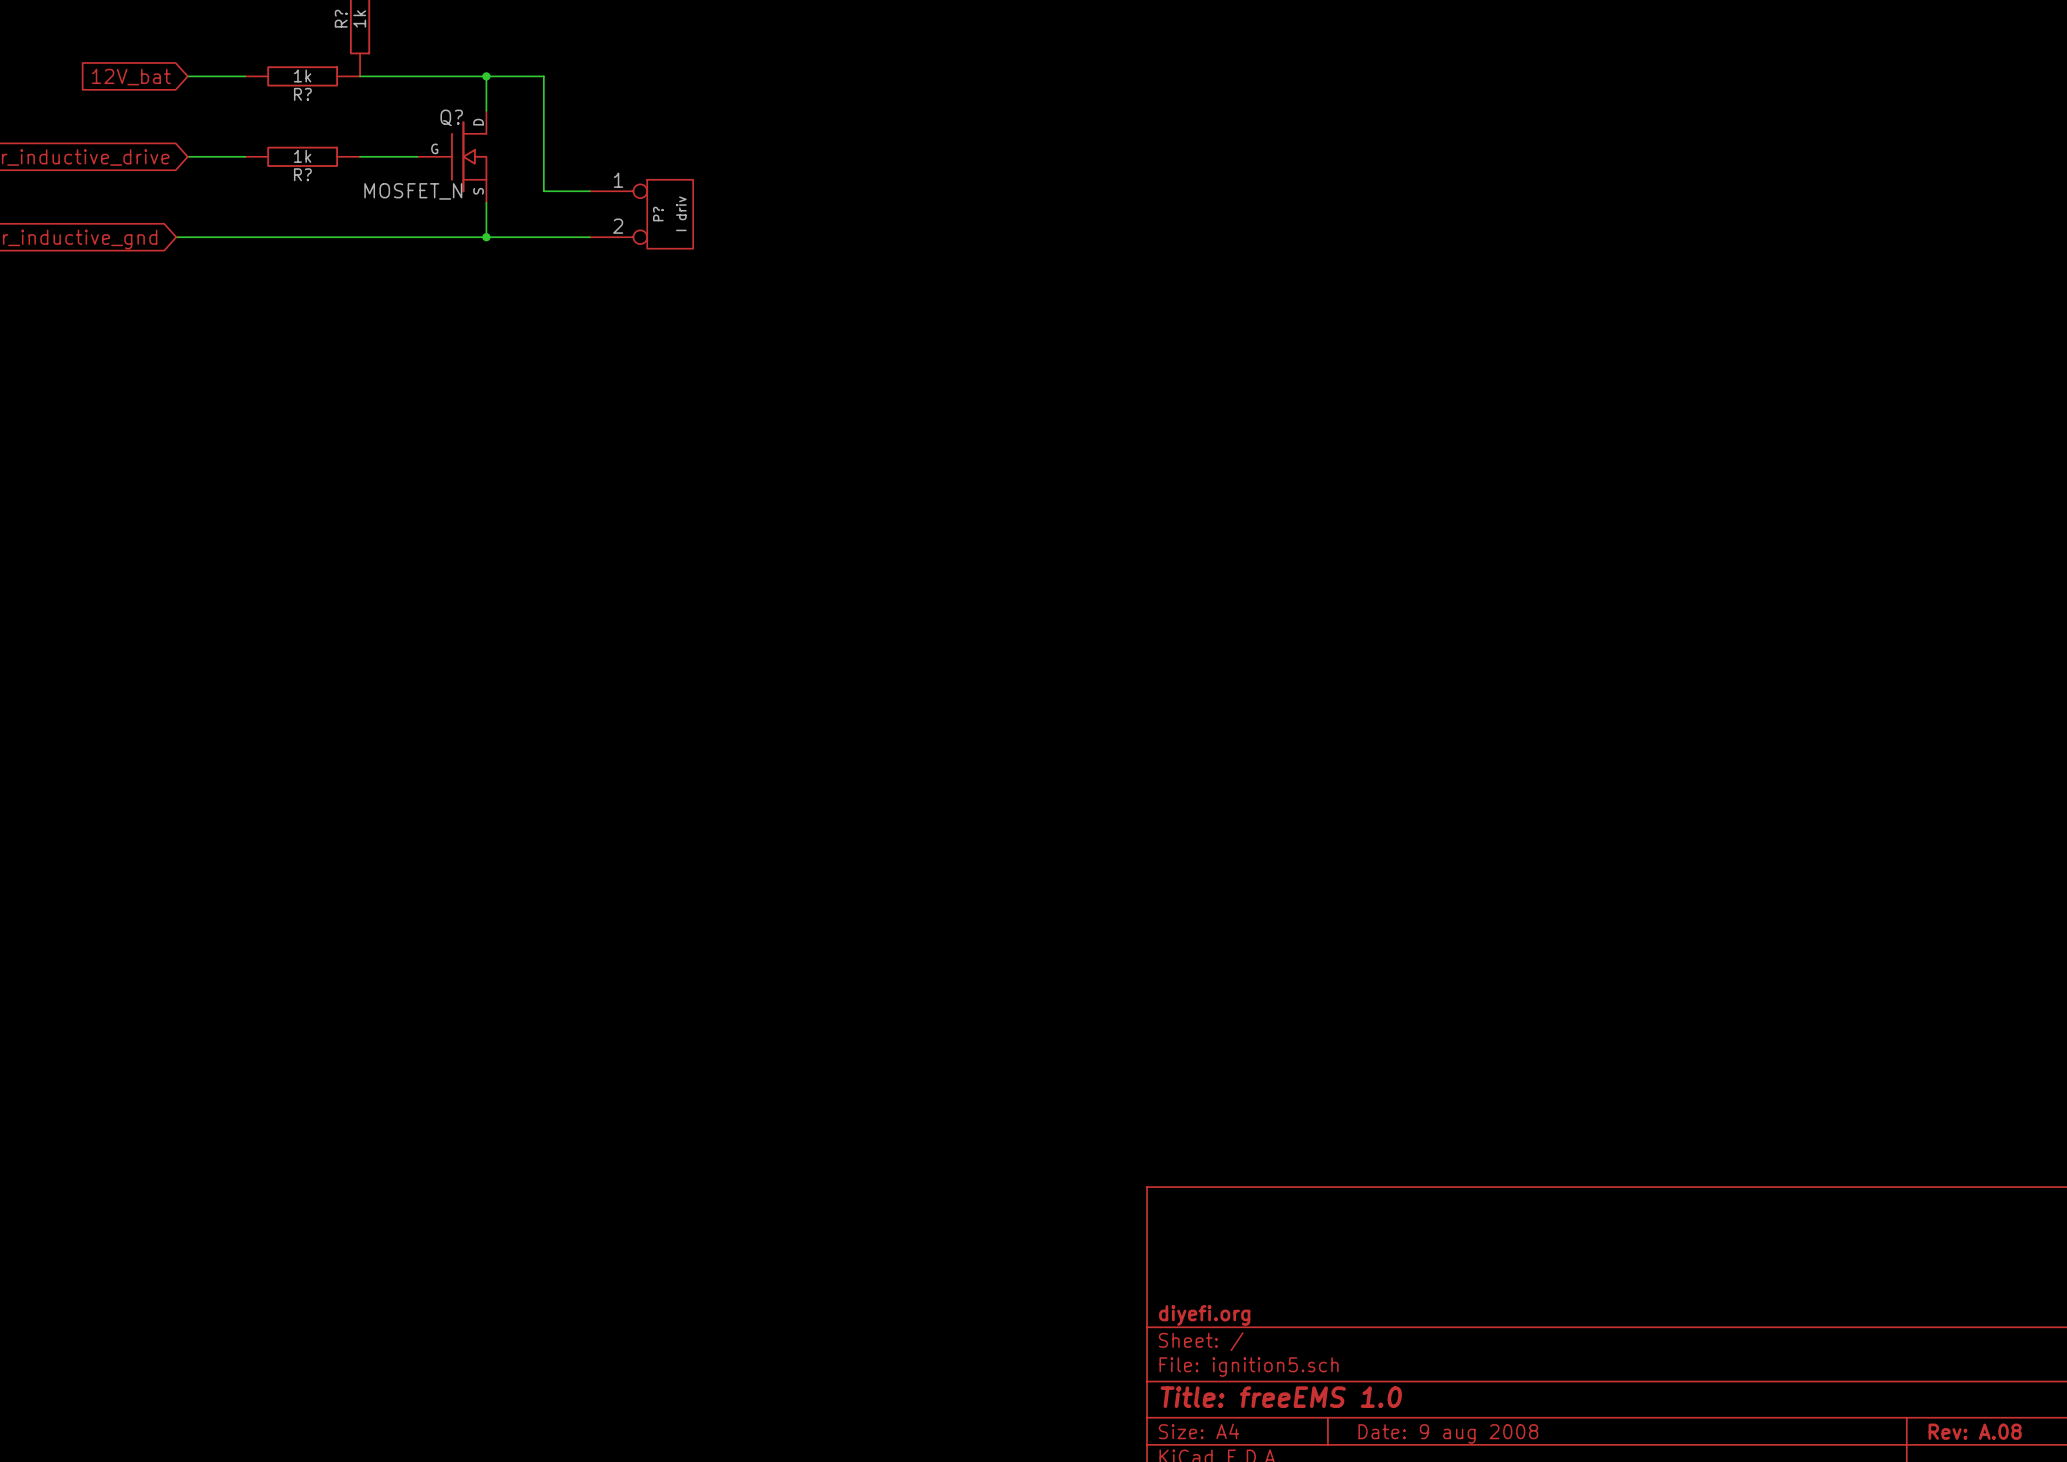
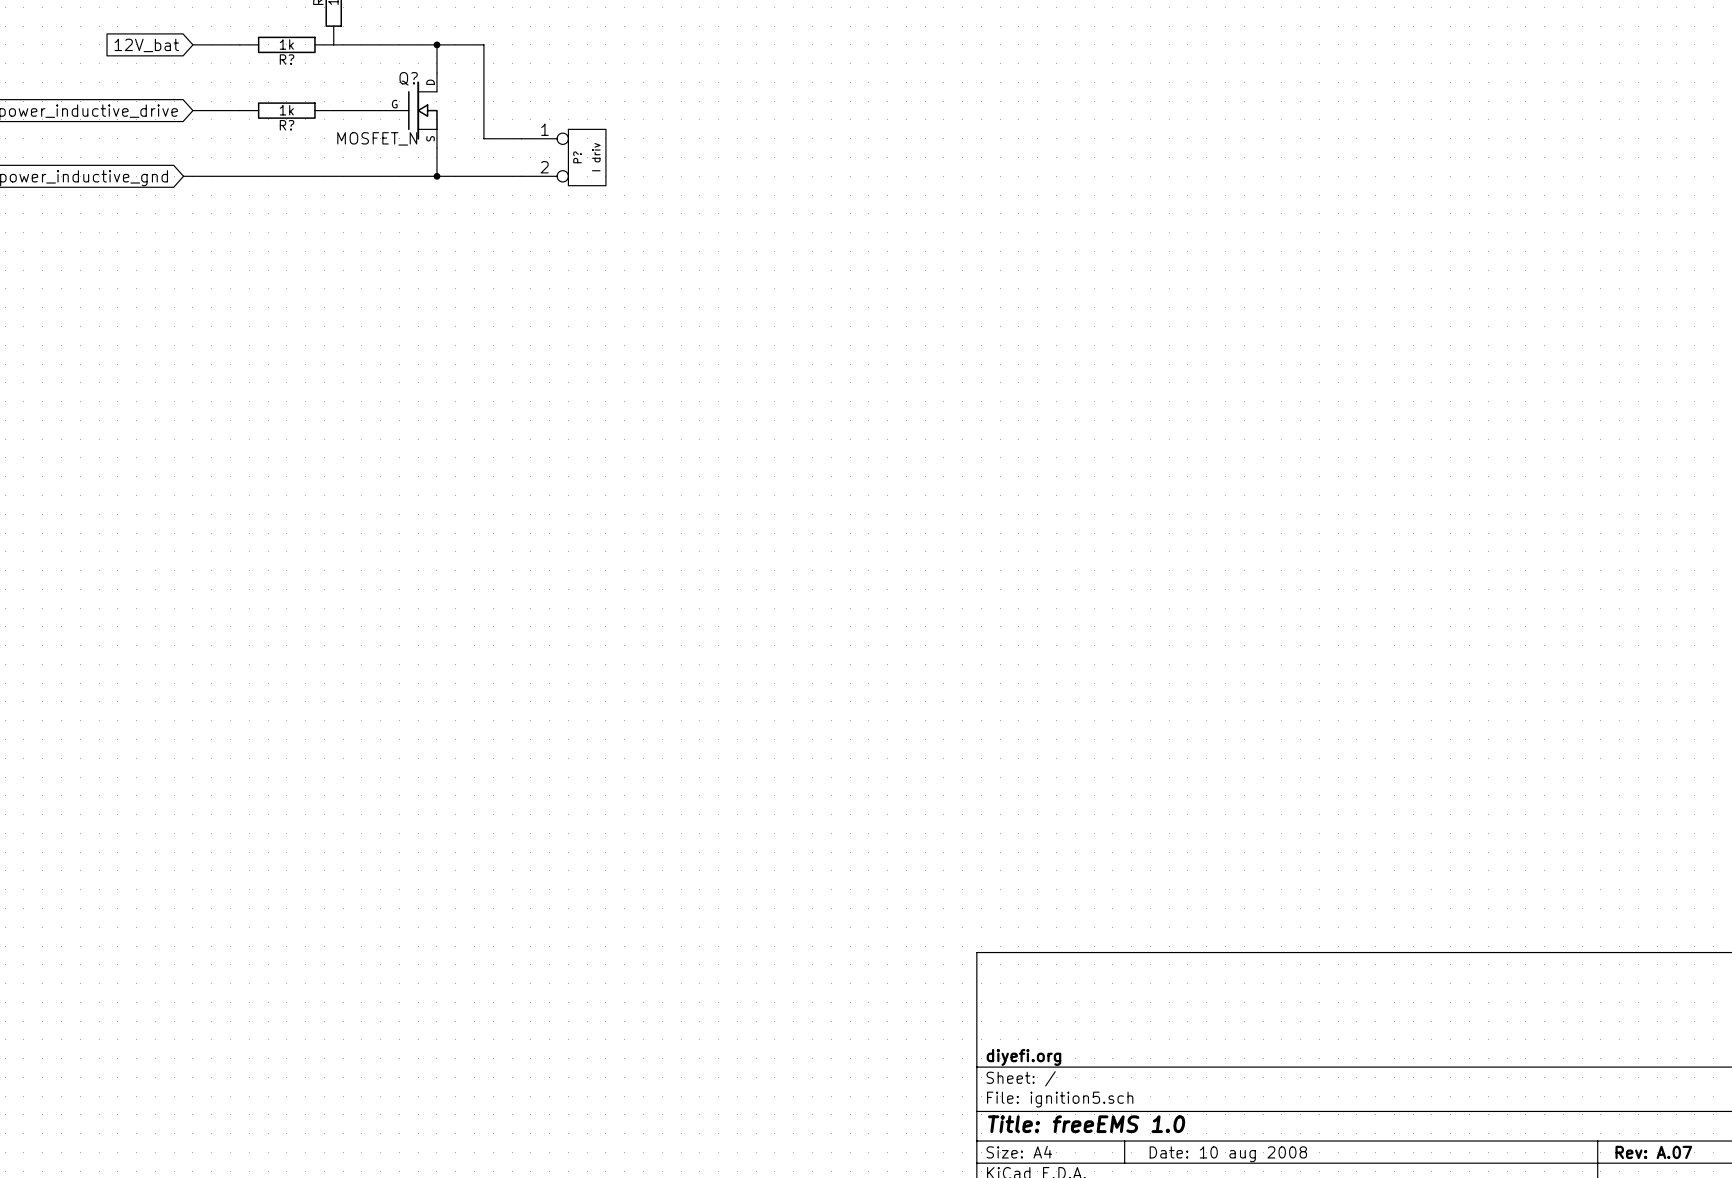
title block: Rev: A.08 (1975, 1431) -> Rev: A.07 (1653, 1152)
title block: Date: 9 aug 2008 (1448, 1433) -> Date: 10 aug 2008 (1228, 1154)

